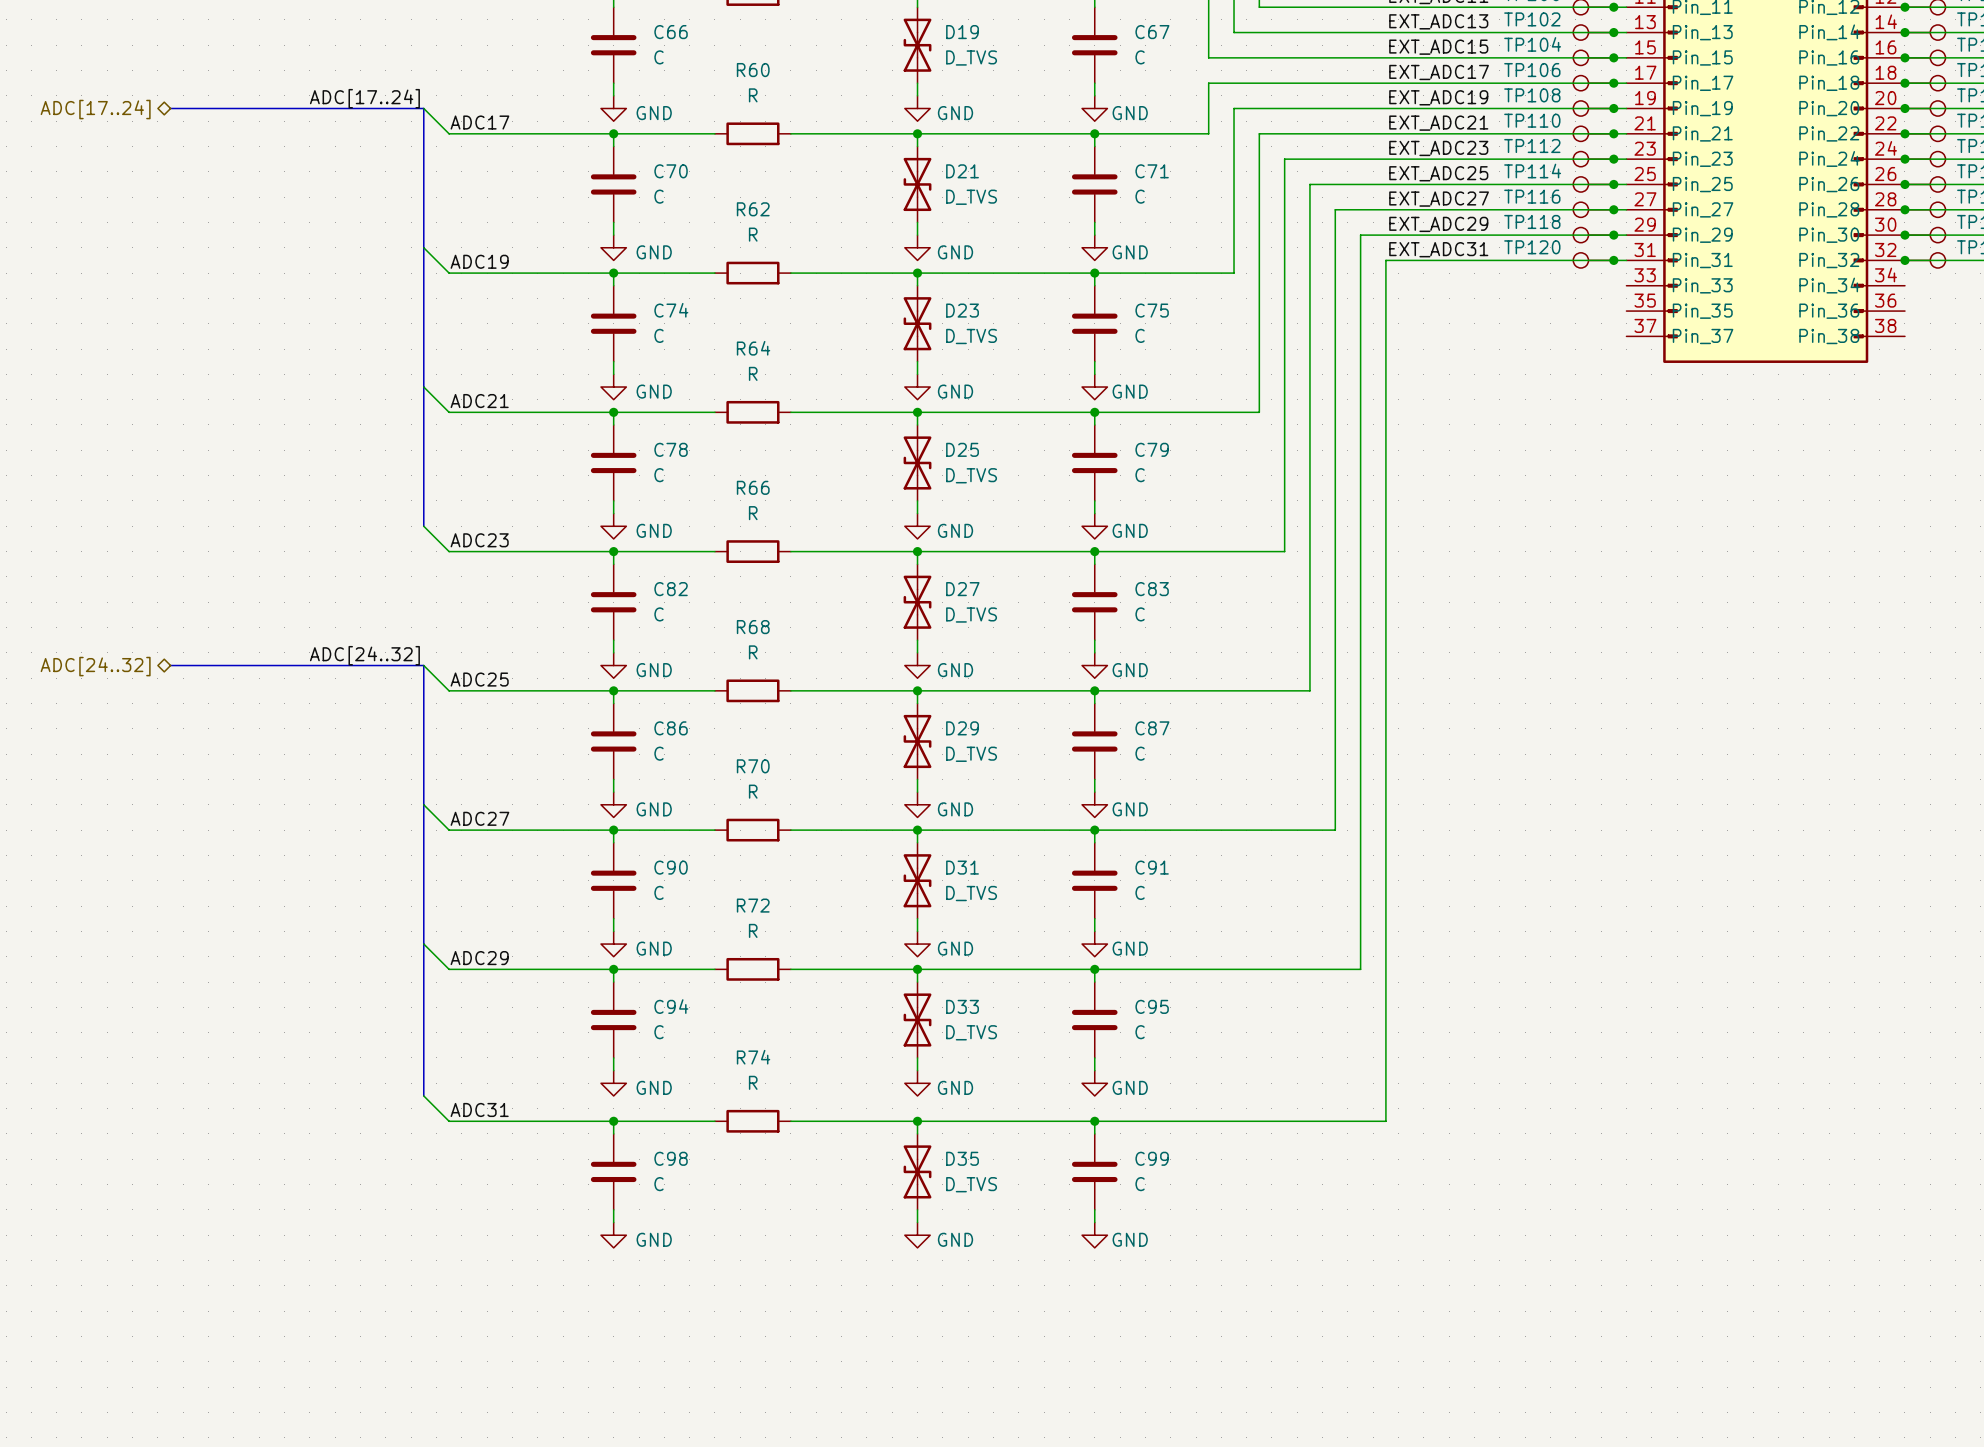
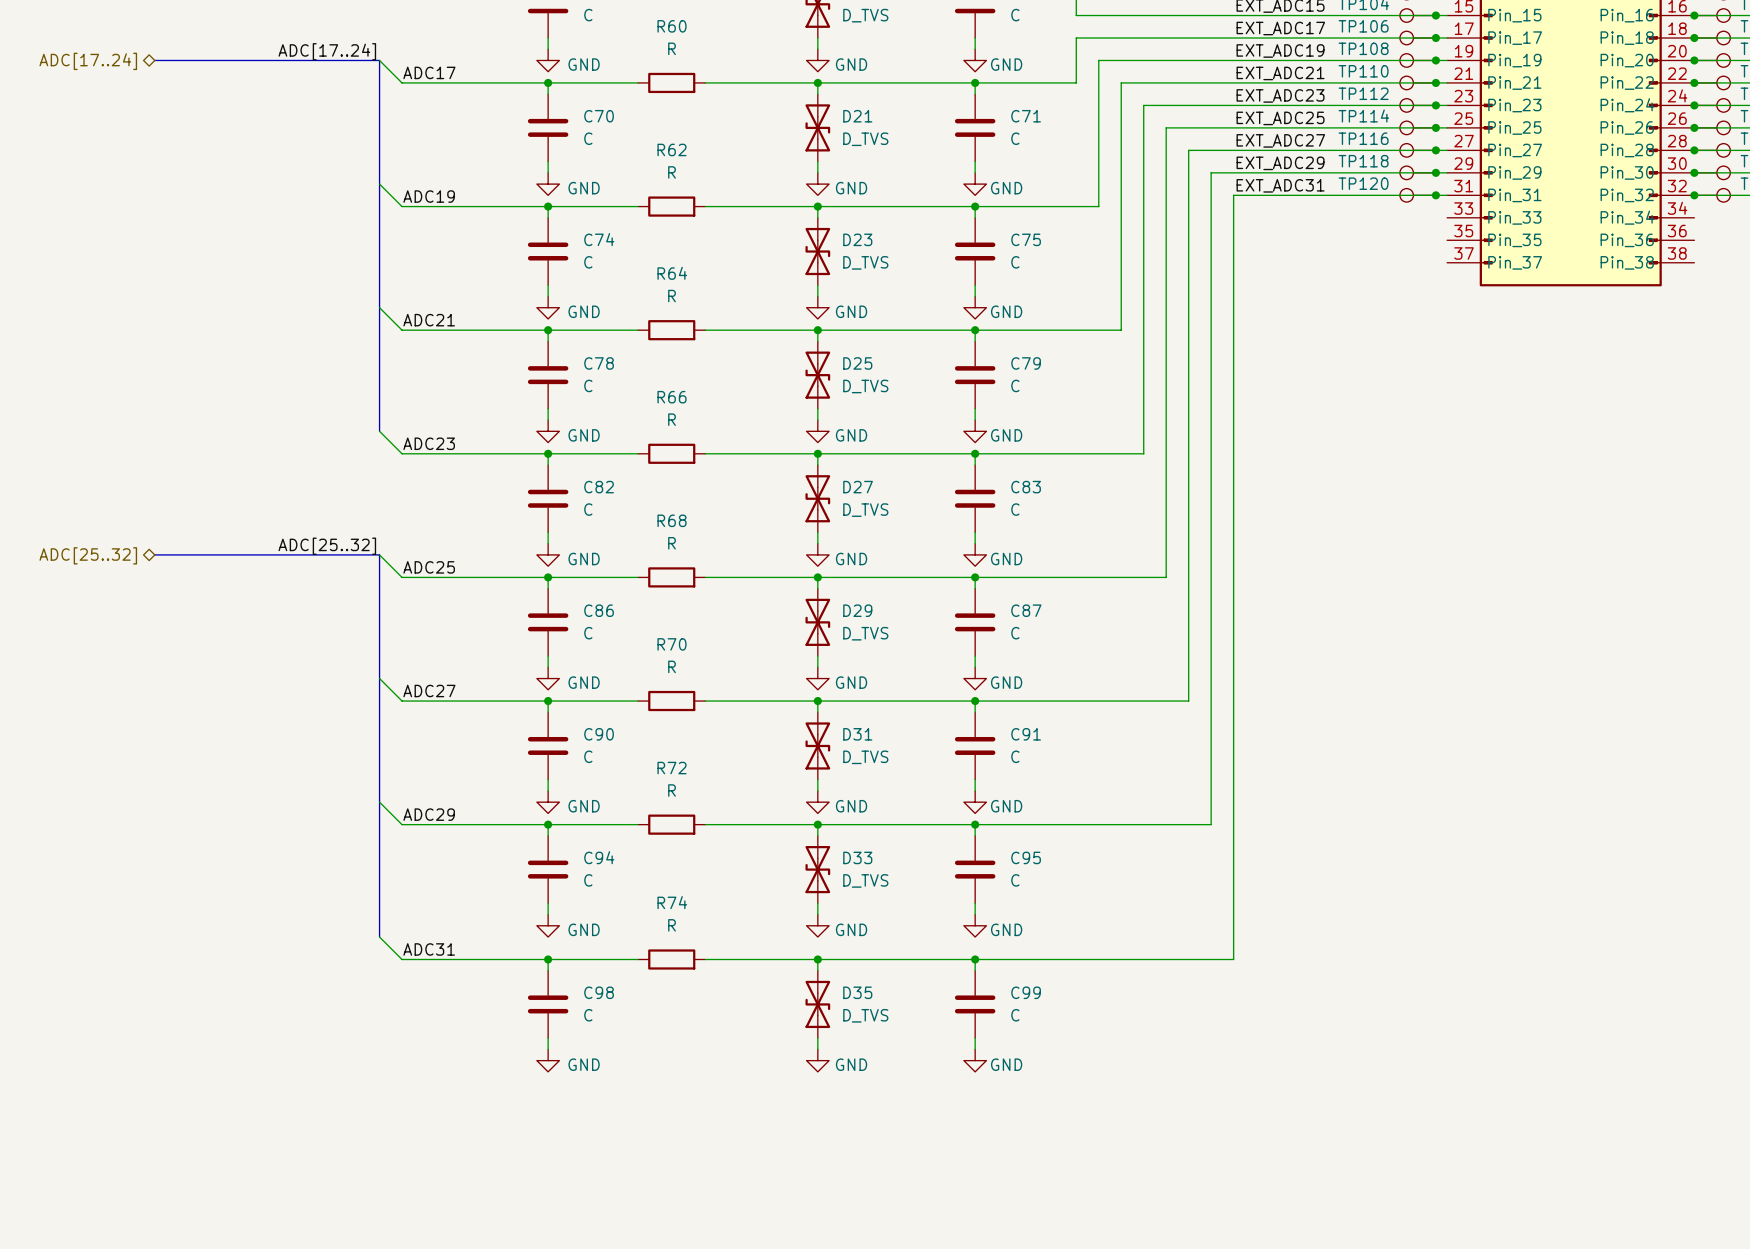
label: ADC[24..32] (364, 655) -> ADC[25..32] (327, 546)
hierarchical label: ADC[24..32] (95, 666) -> ADC[25..32] (88, 555)

